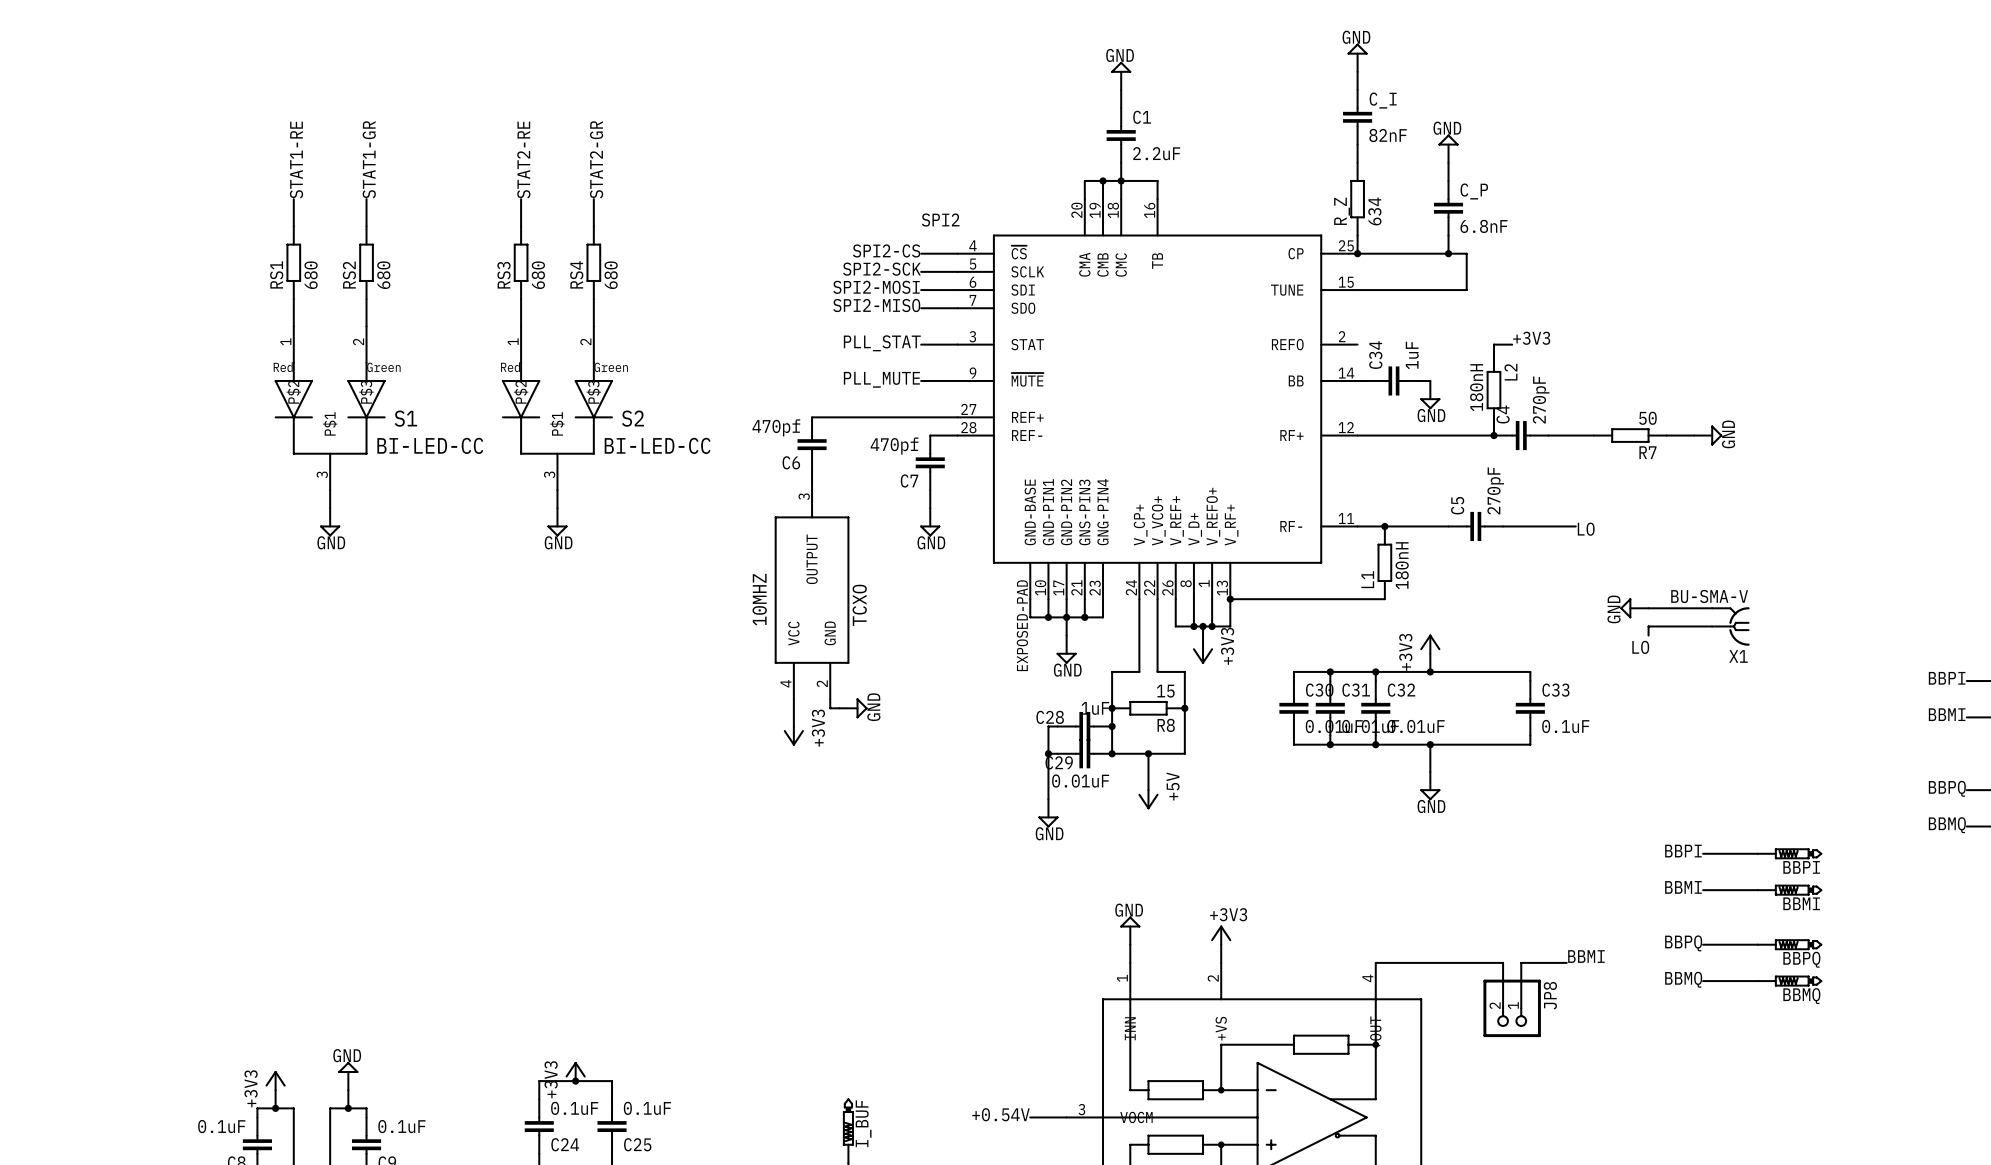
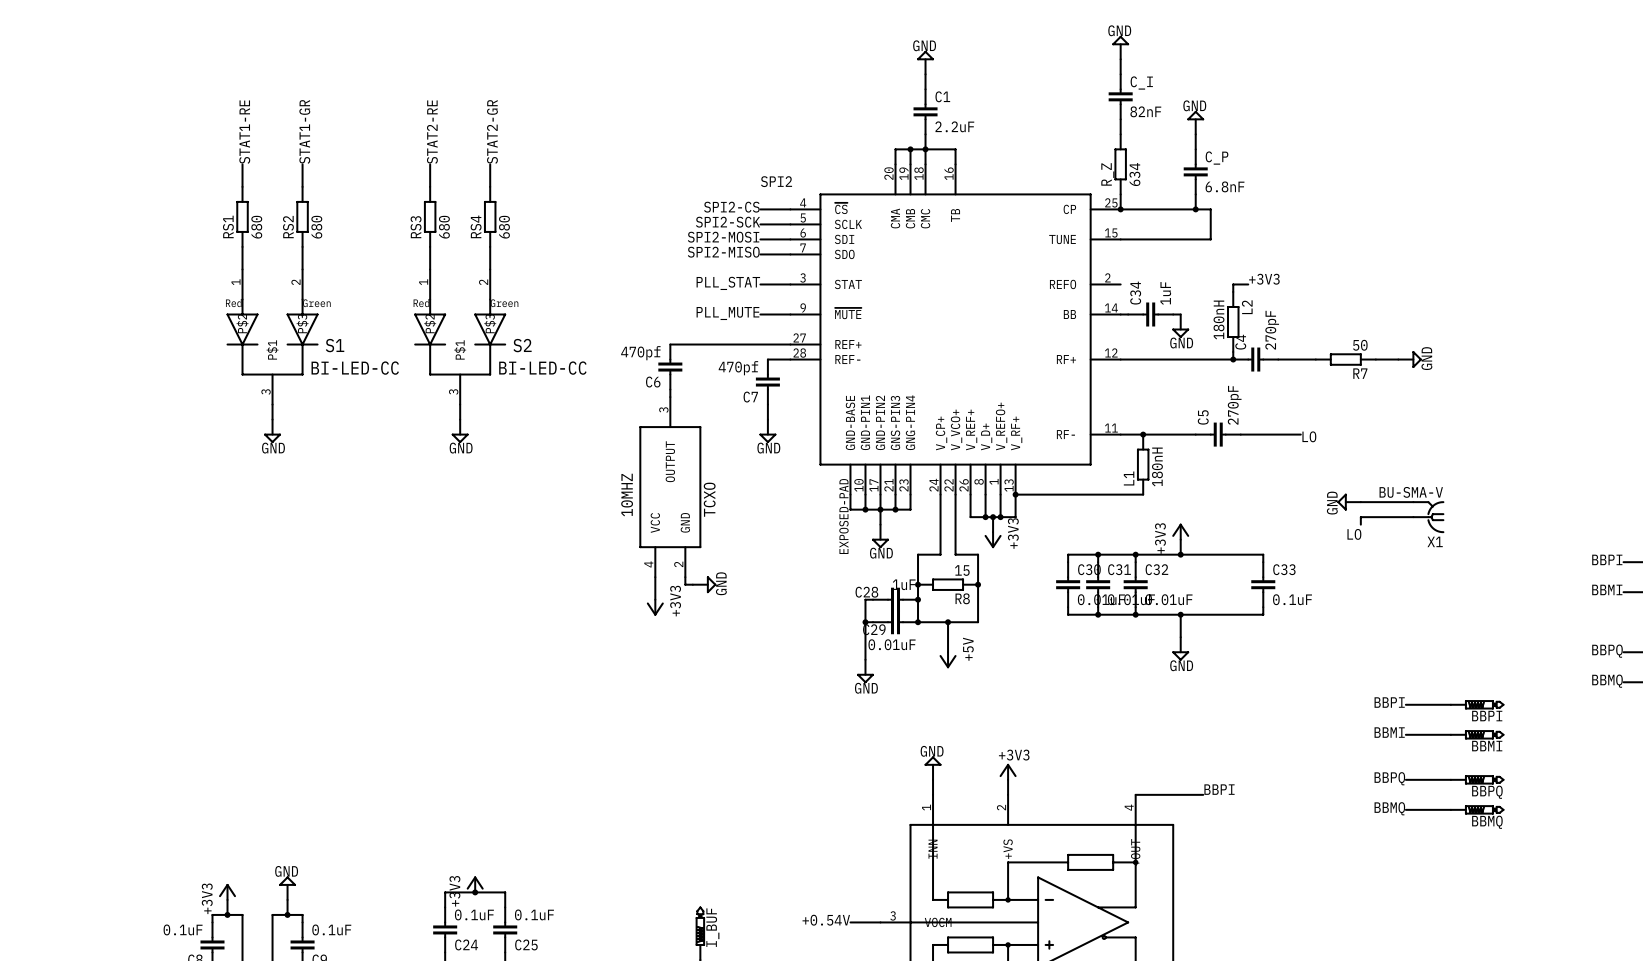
label: none -> BBPI (1219, 789)
label: BBMI (1586, 956) -> none
wire: (1457, 962) (1503, 962) (1503, 1008) -> none
wire: (1566, 962) (1521, 962) (1521, 1008) -> none
JP8: (1512, 1008) -> none

